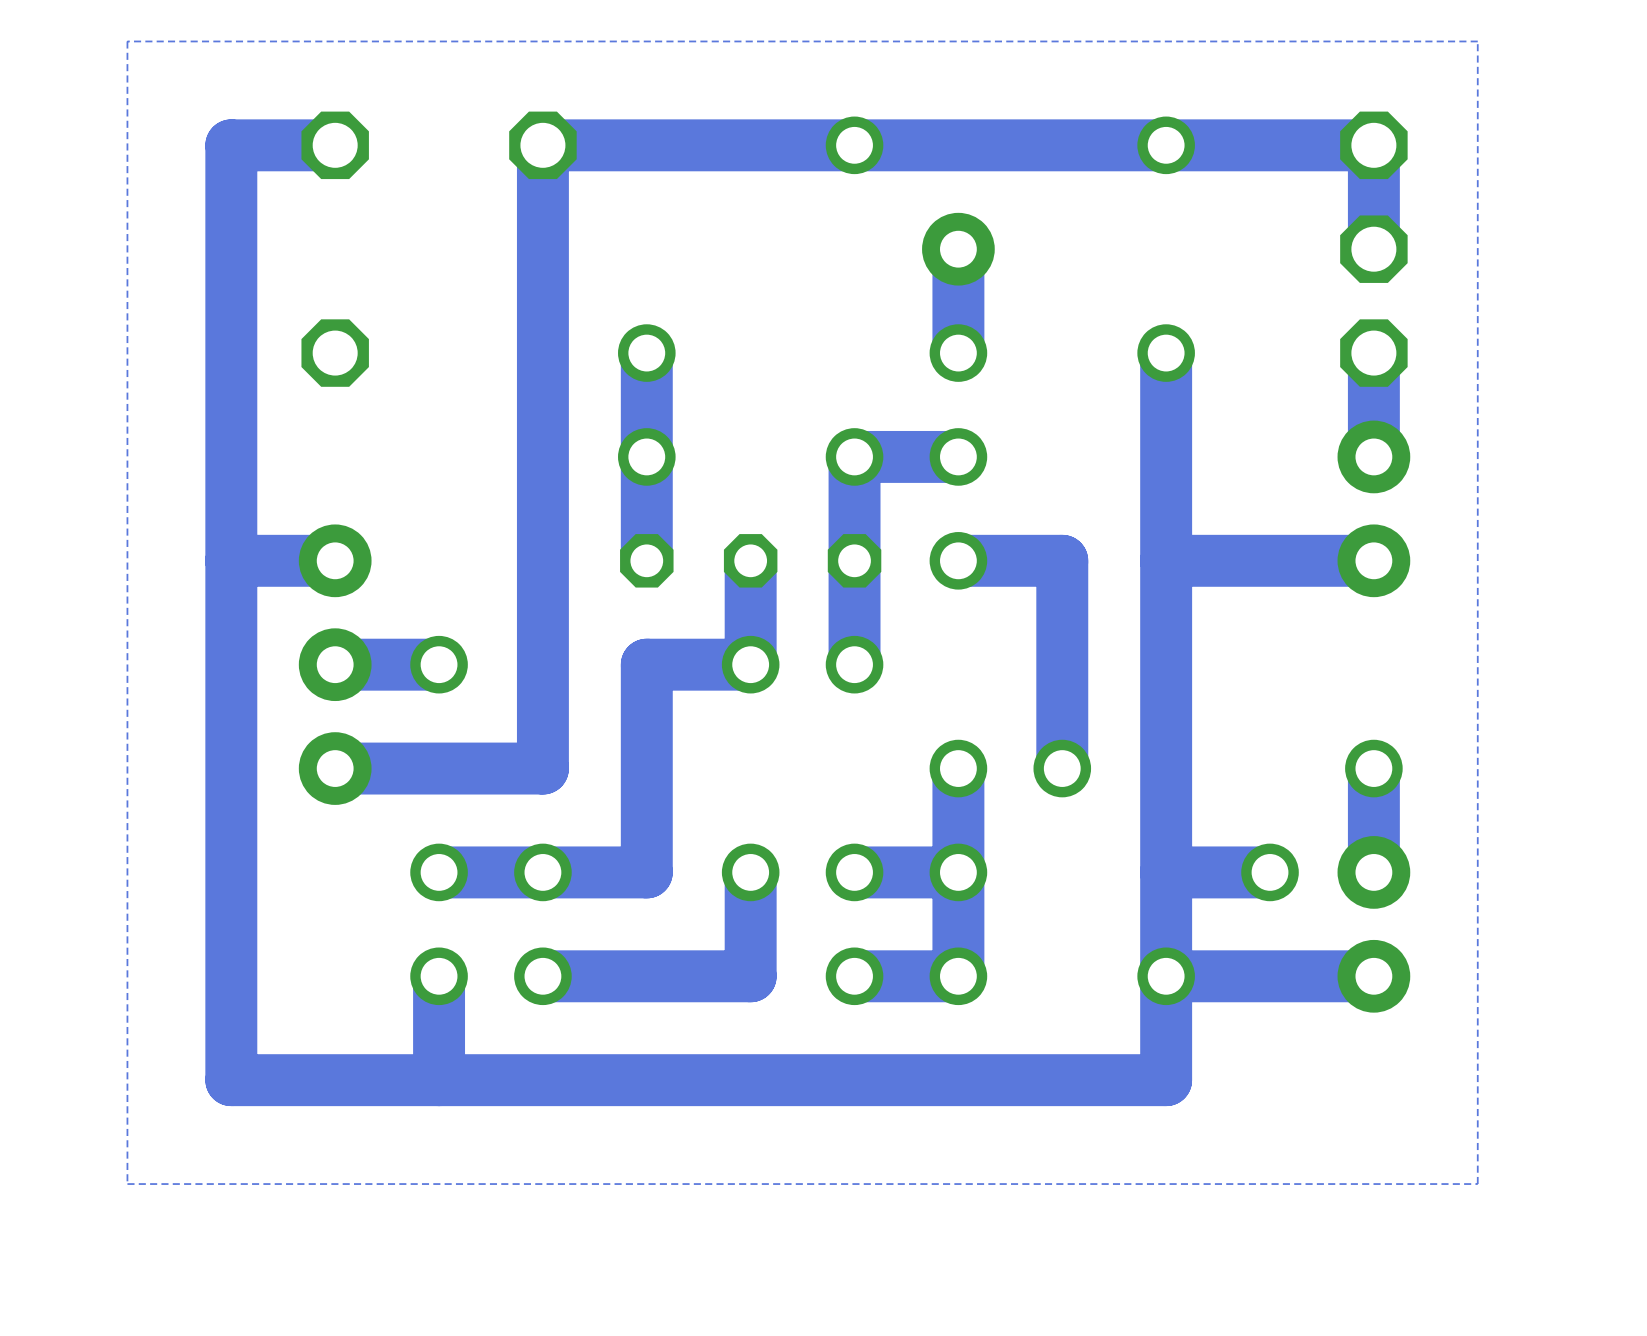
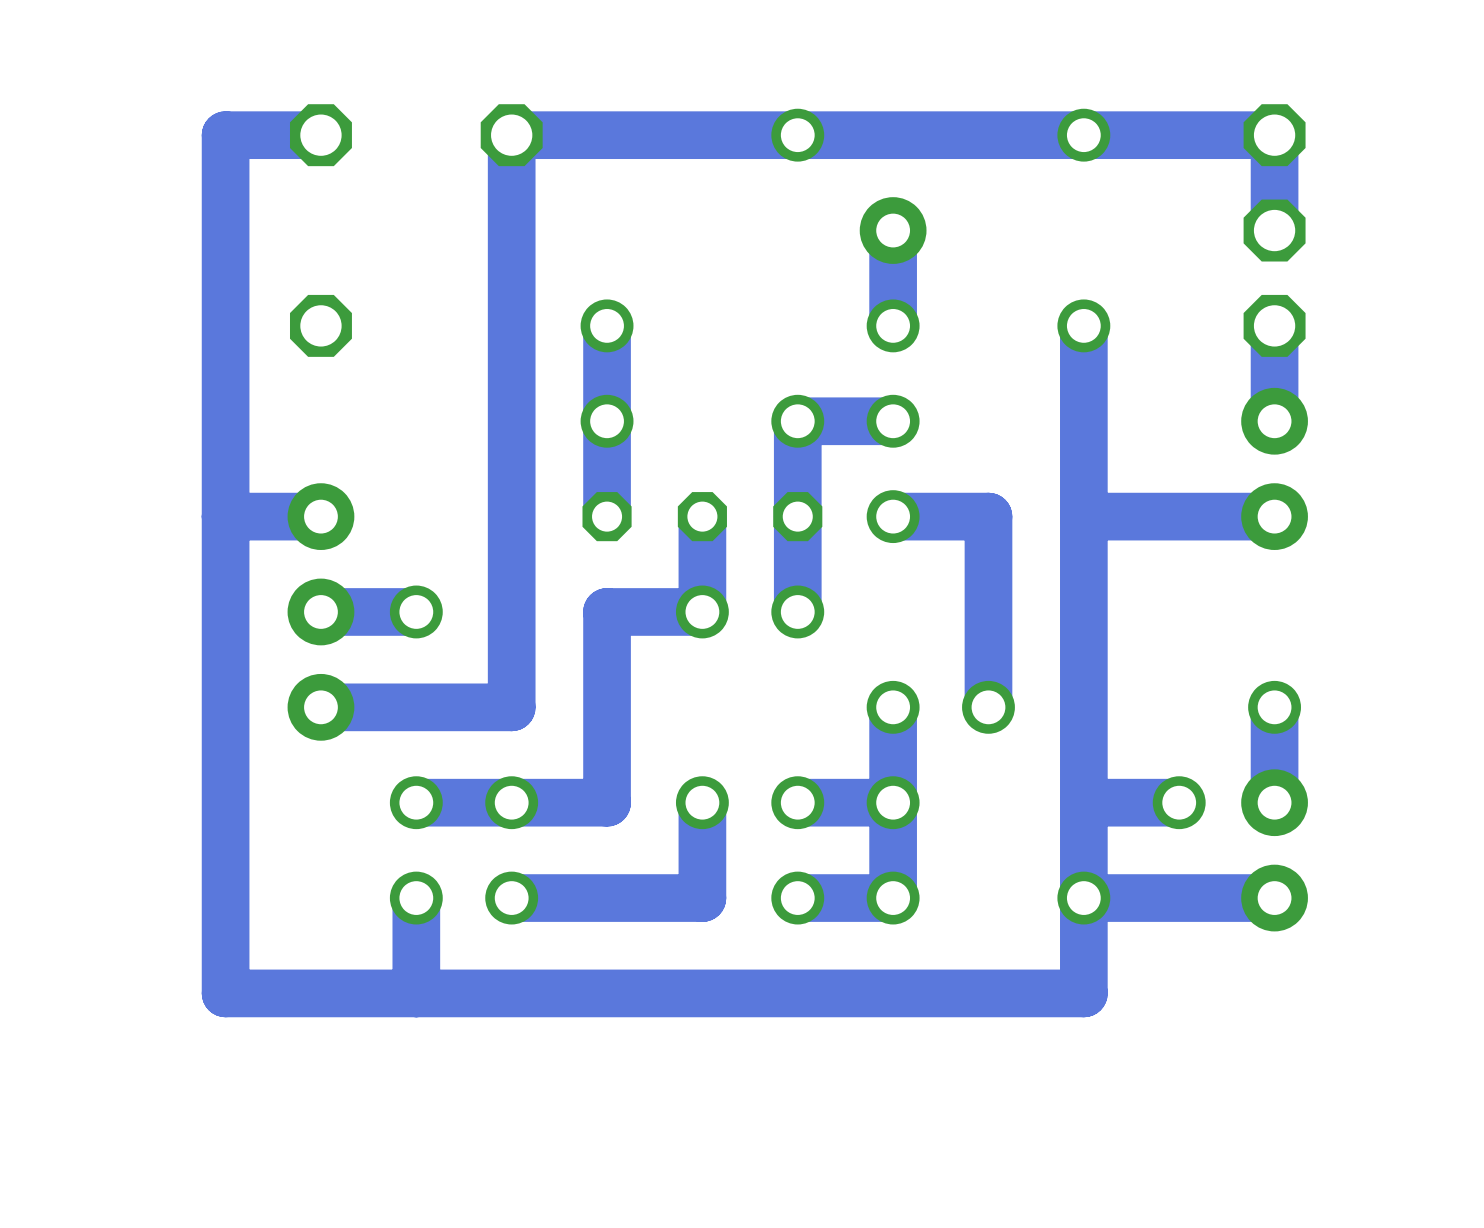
bottom zone outline: (1477, 41) (1477, 1184) (127, 1184) (127, 41) (1477, 41) -> none

